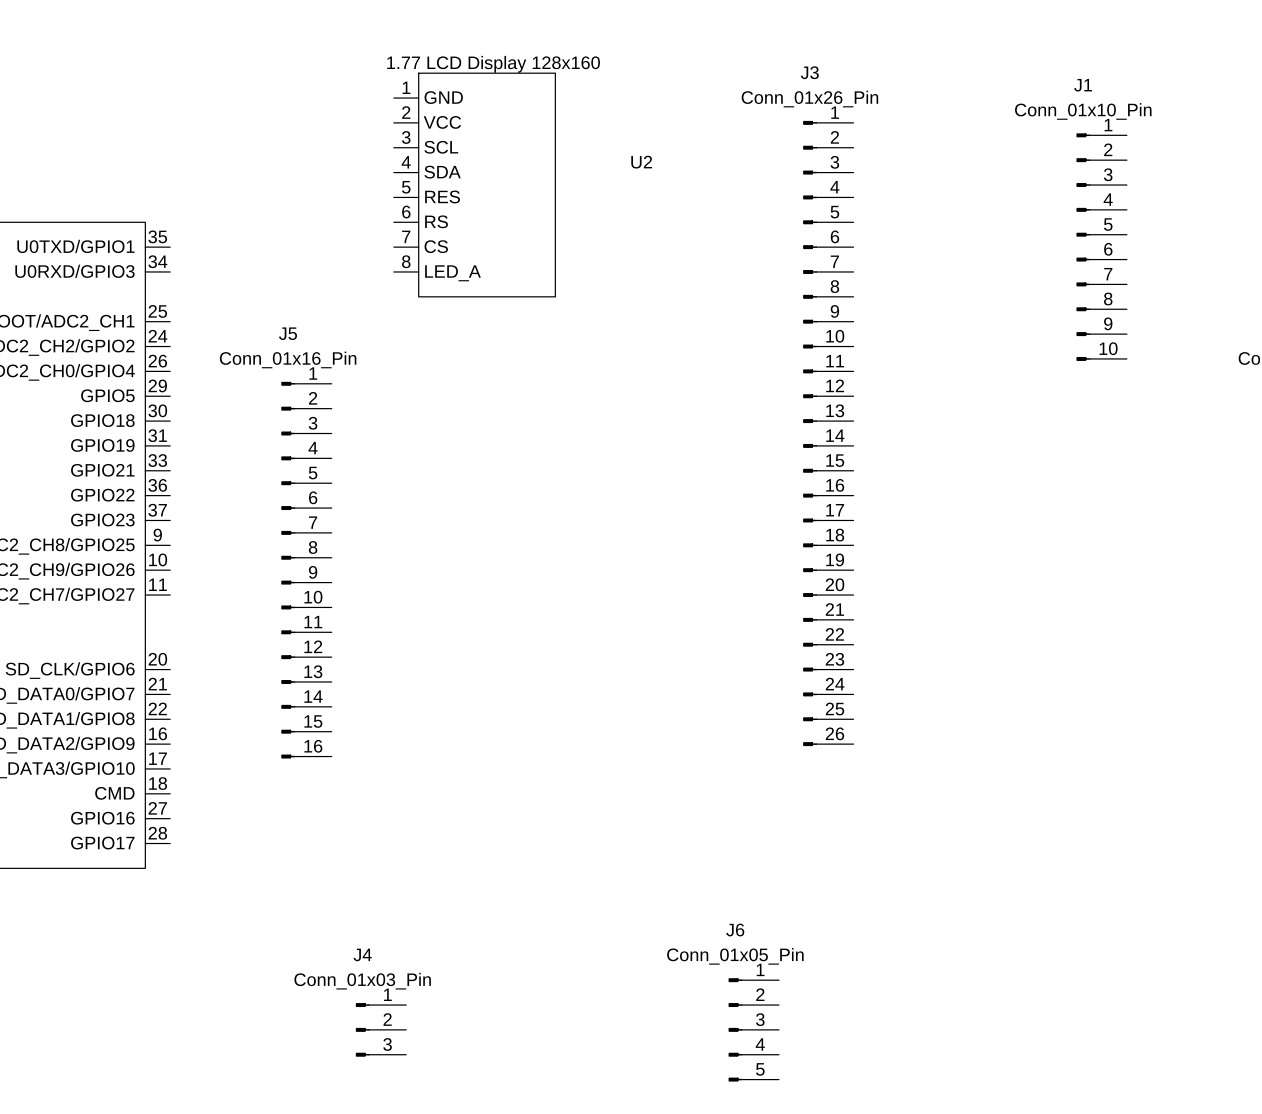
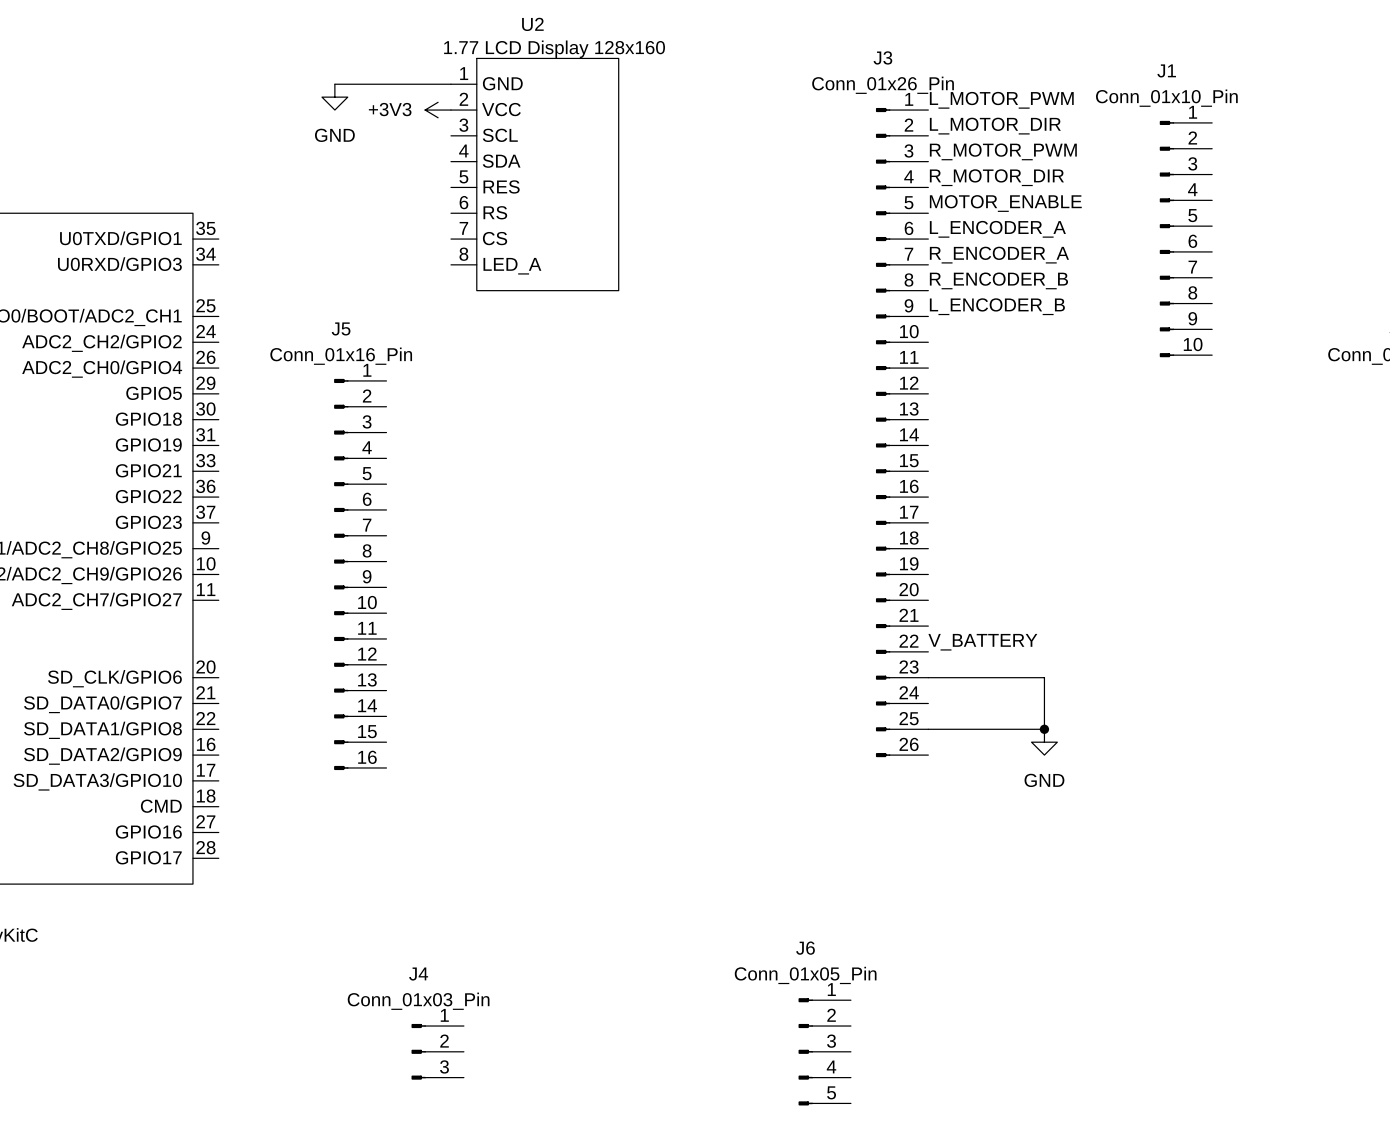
wire: none -> (334, 84) (450, 84)
power symbol: none -> GND (334, 97)
label: none -> L_MOTOR_PWM (1001, 100)
power symbol: none -> +3V3 (438, 110)
label: none -> L_MOTOR_DIR (995, 126)
U2 name position: U2 (641, 162) -> U2 (532, 24)
label: none -> R_MOTOR_PWM (1003, 151)
label: none -> R_MOTOR_DIR (996, 177)
label: none -> MOTOR_ENABLE (1005, 203)
label: none -> L_ENCODER_A (997, 229)
label: none -> R_ENCODER_A (999, 255)
label: none -> R_ENCODER_B (998, 280)
label: none -> L_ENCODER_B (997, 306)
label: none -> V_BATTERY (982, 642)
wire: none -> (928, 677) (1044, 677) (1044, 729) (928, 729)
junction: none -> (1044, 729)
power symbol: none -> GND (1044, 742)

